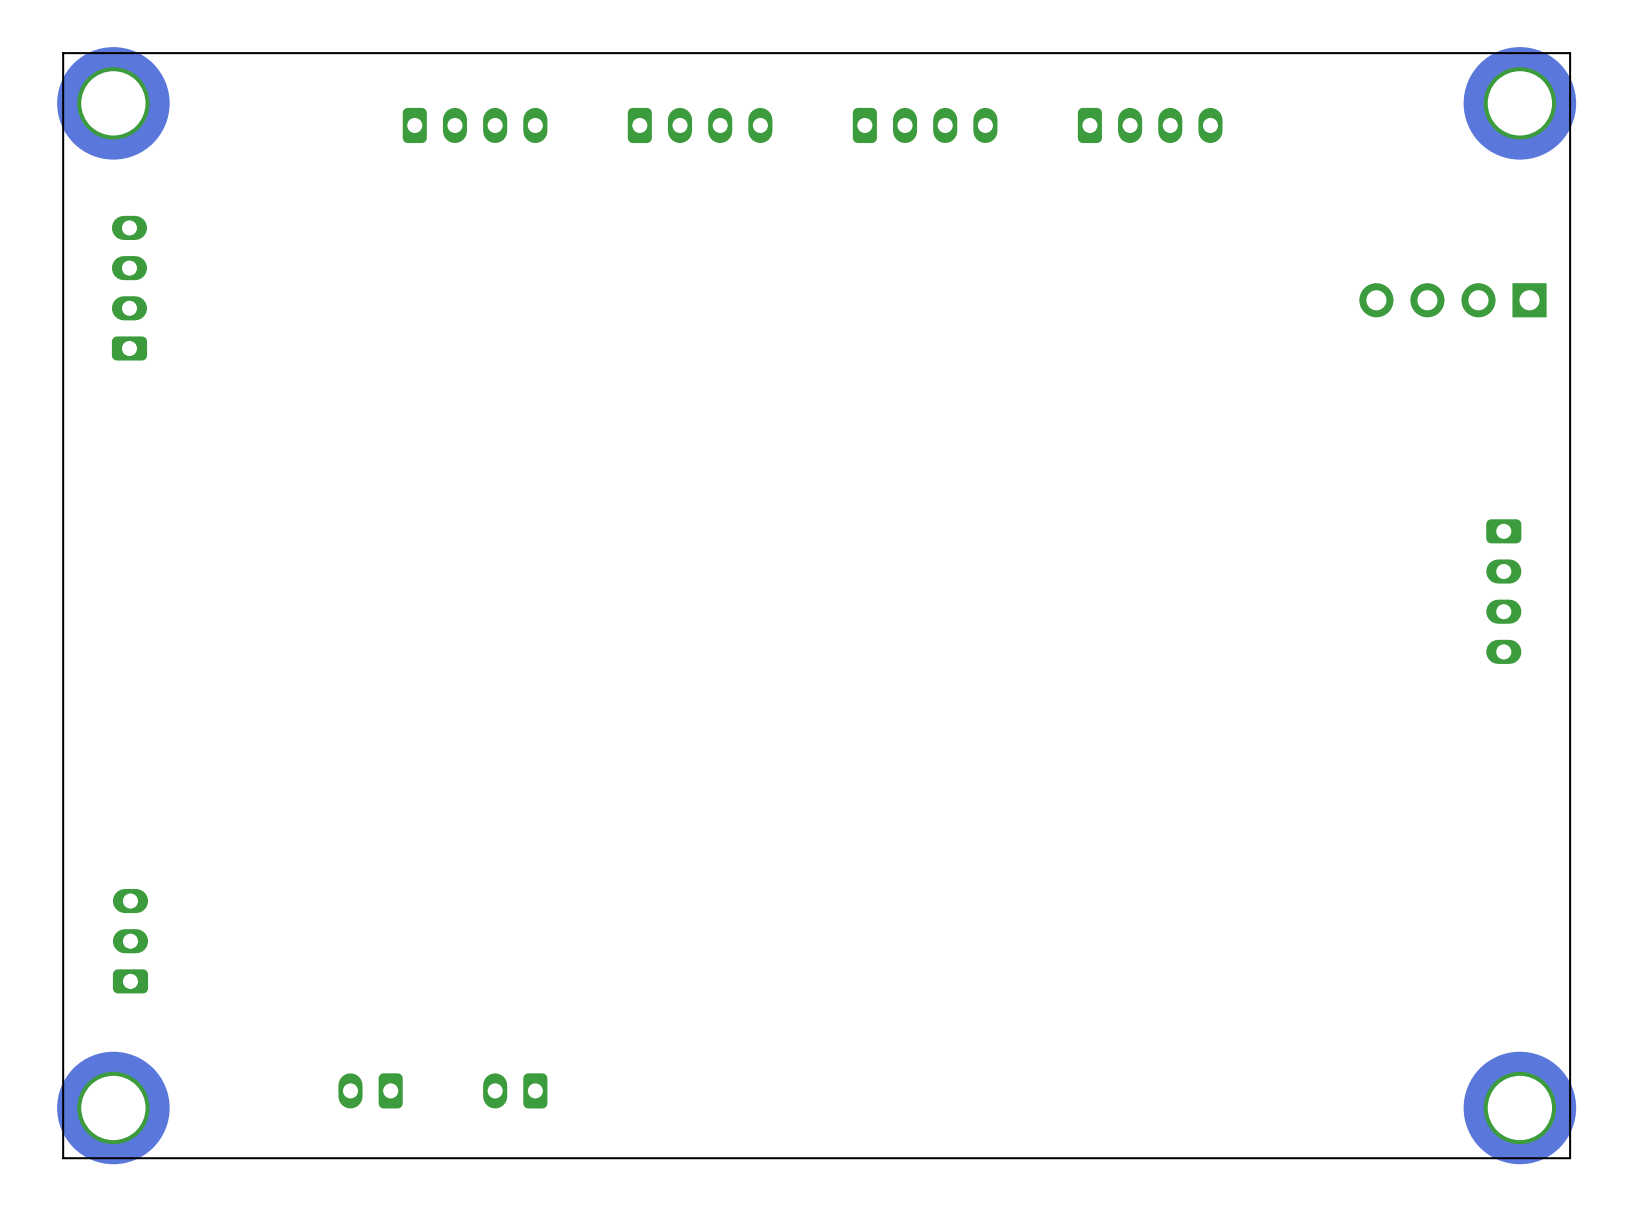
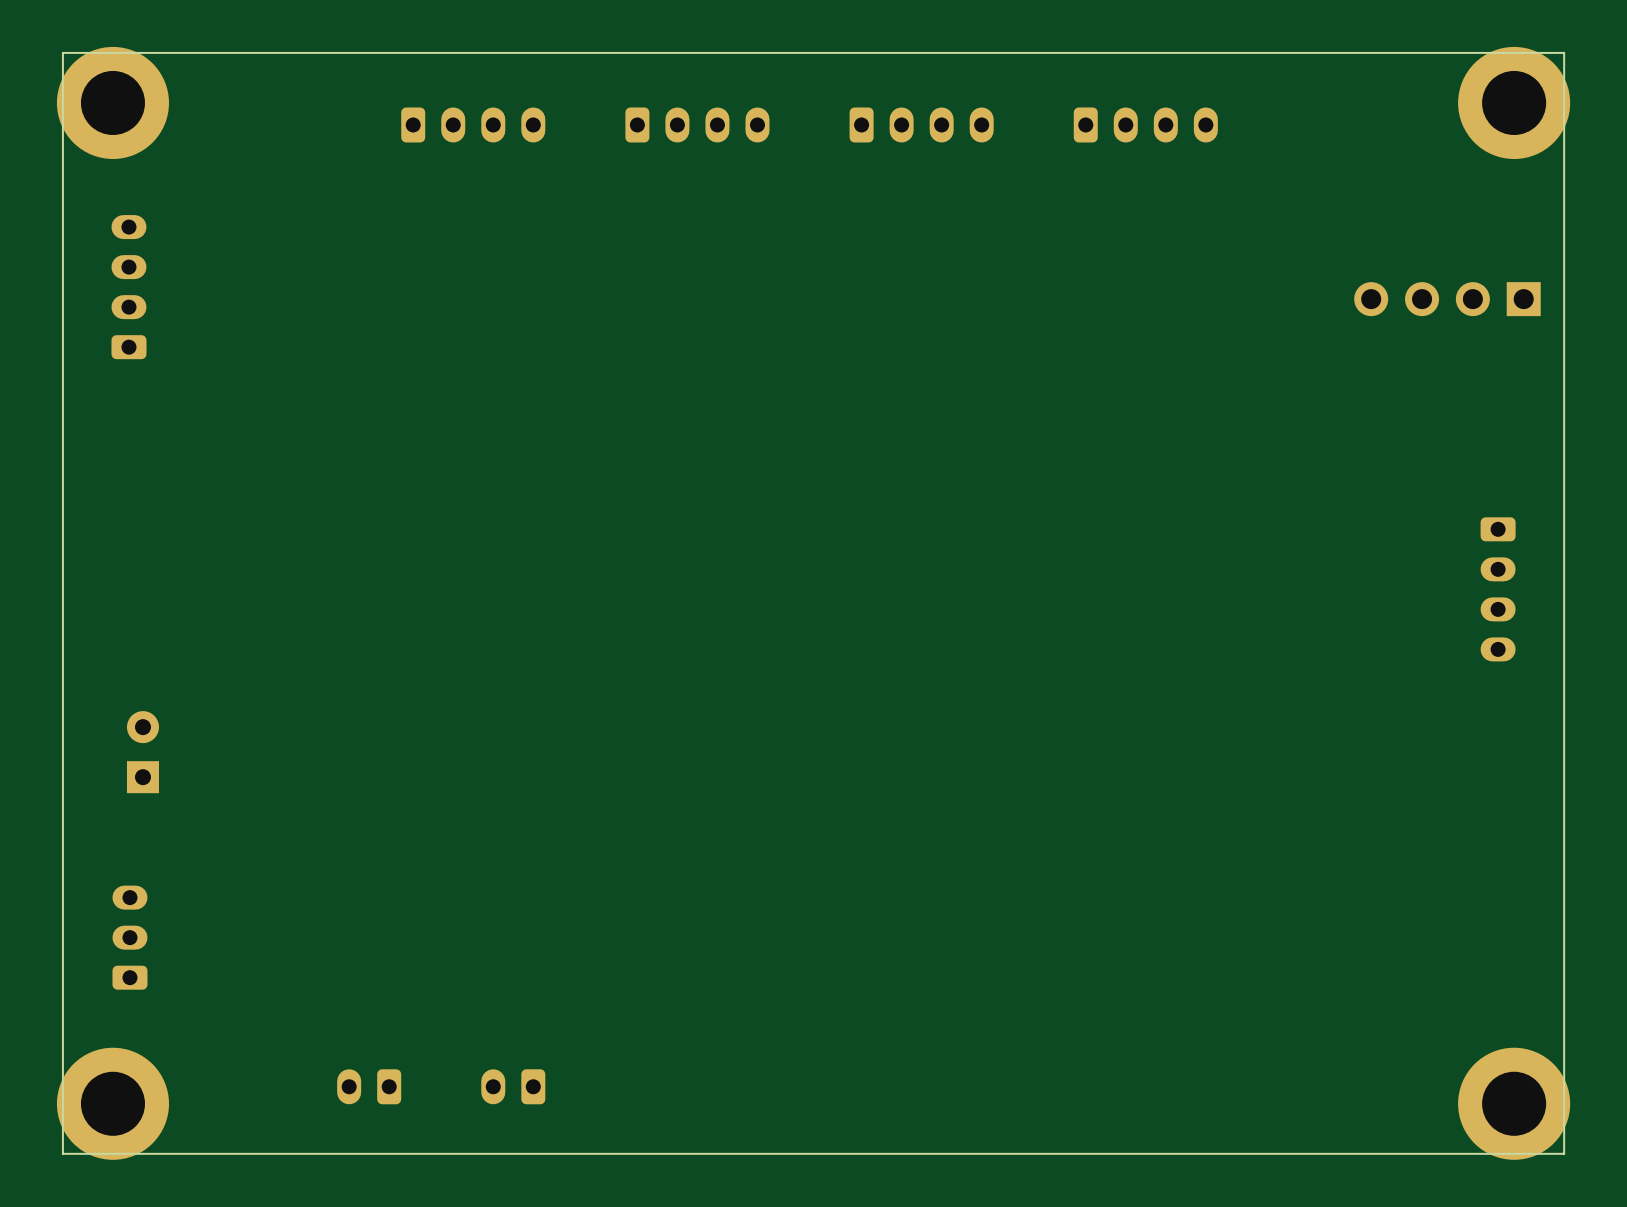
part: none -> (142, 752)

